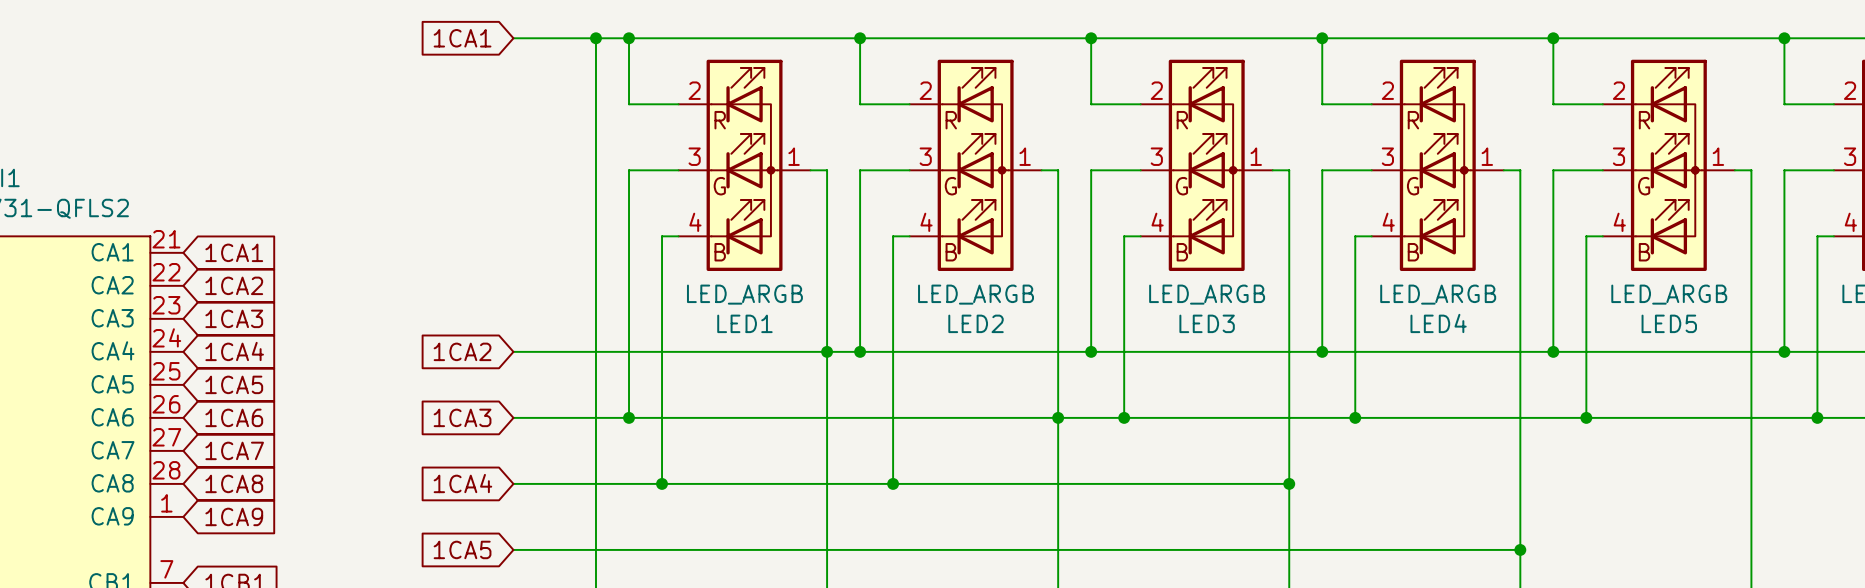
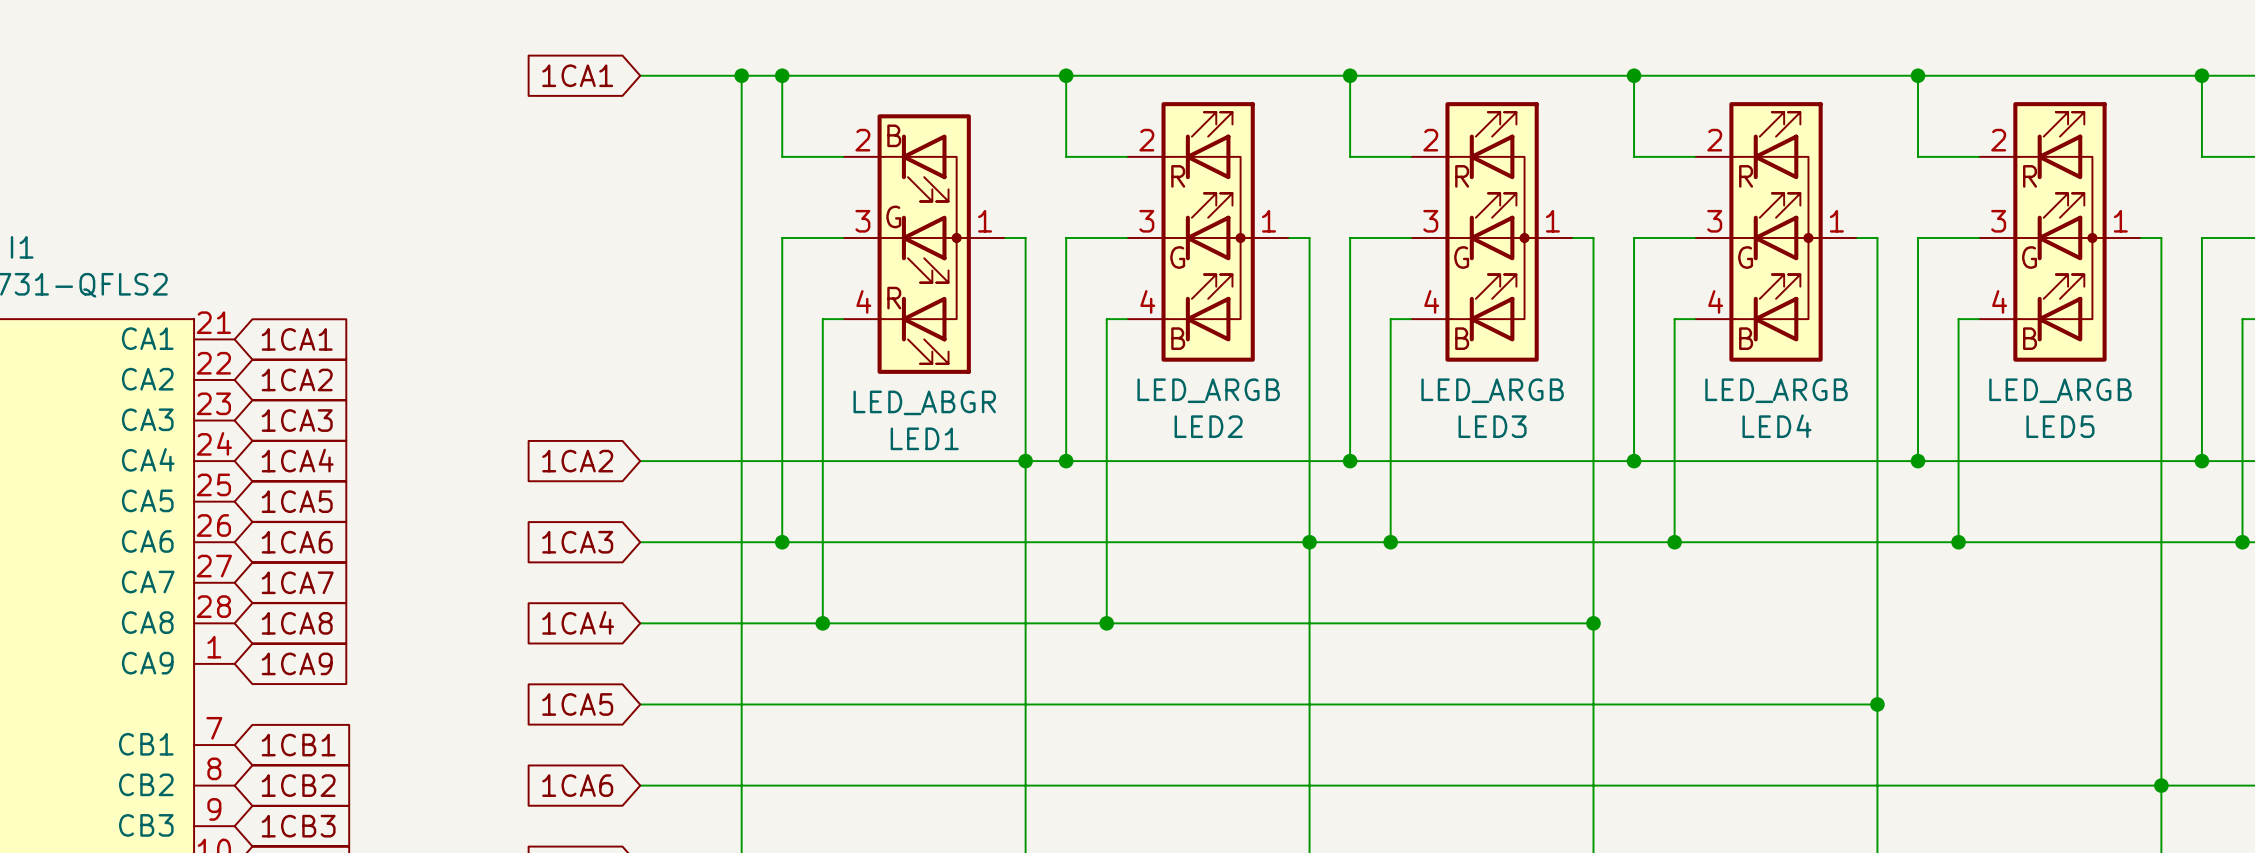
LED1 symbol: [678, 59, 811, 272] -> [843, 114, 1006, 374]
LED1 value: LED_ARGB (744, 294) -> LED_ABGR (924, 402)

